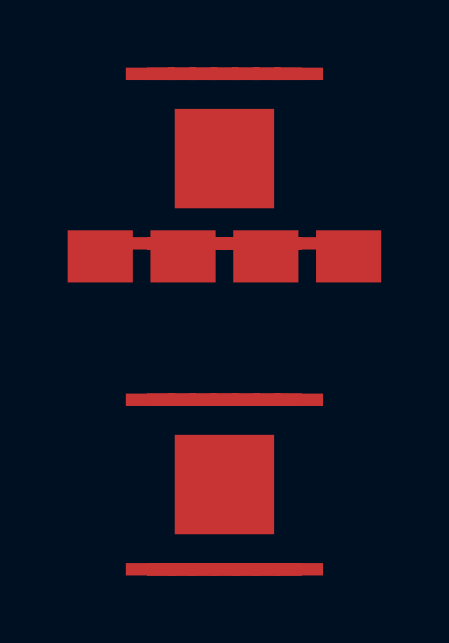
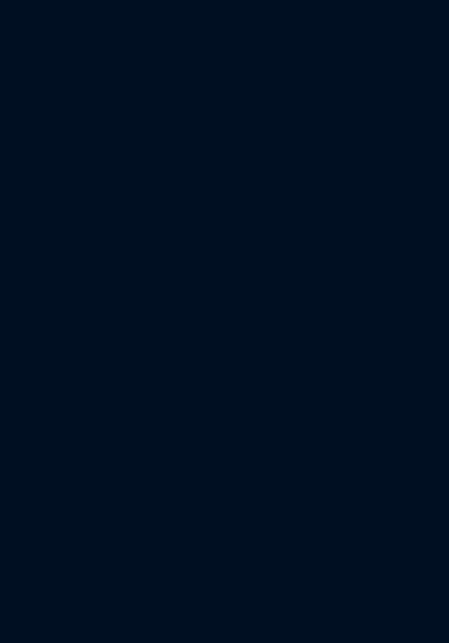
part: (224, 158) -> none
part: (224, 256) -> none
part: (224, 484) -> none

